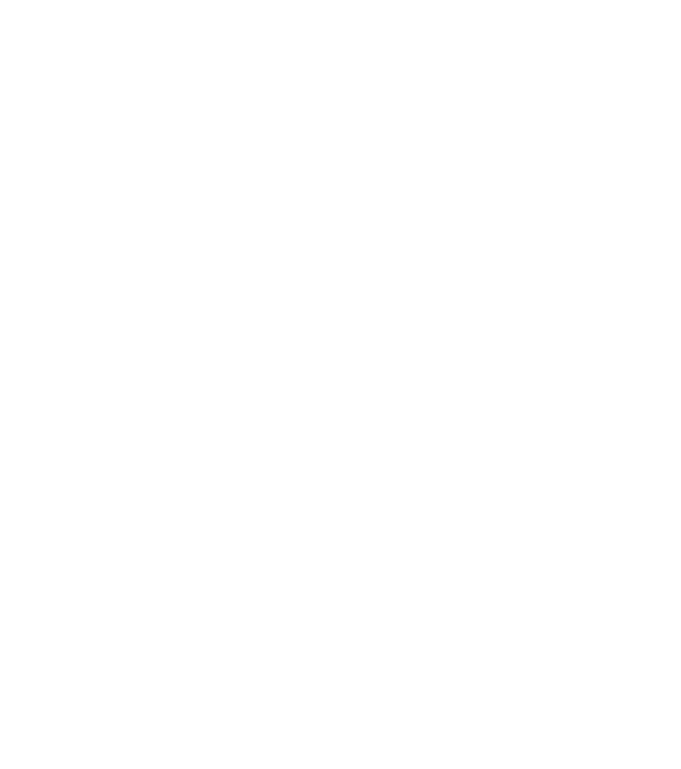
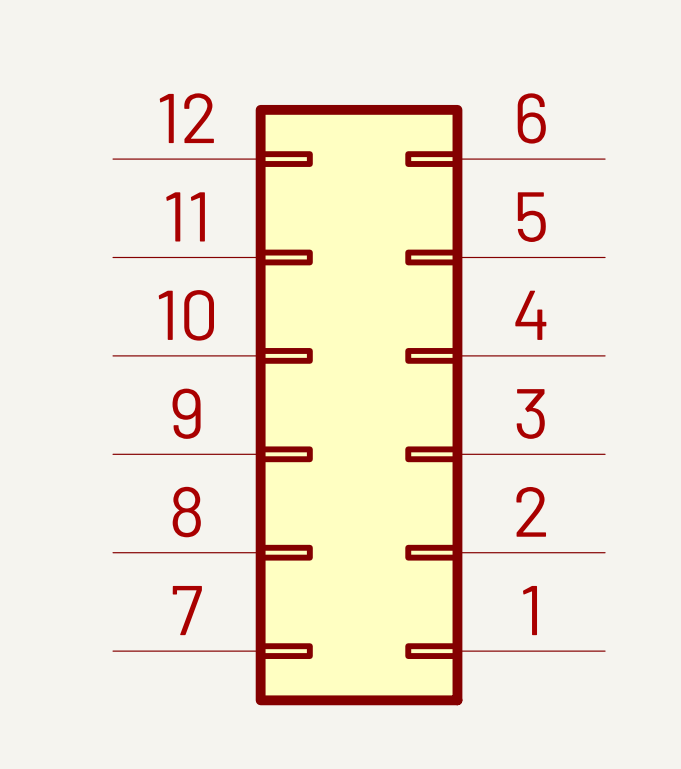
part: none -> (359, 405)

